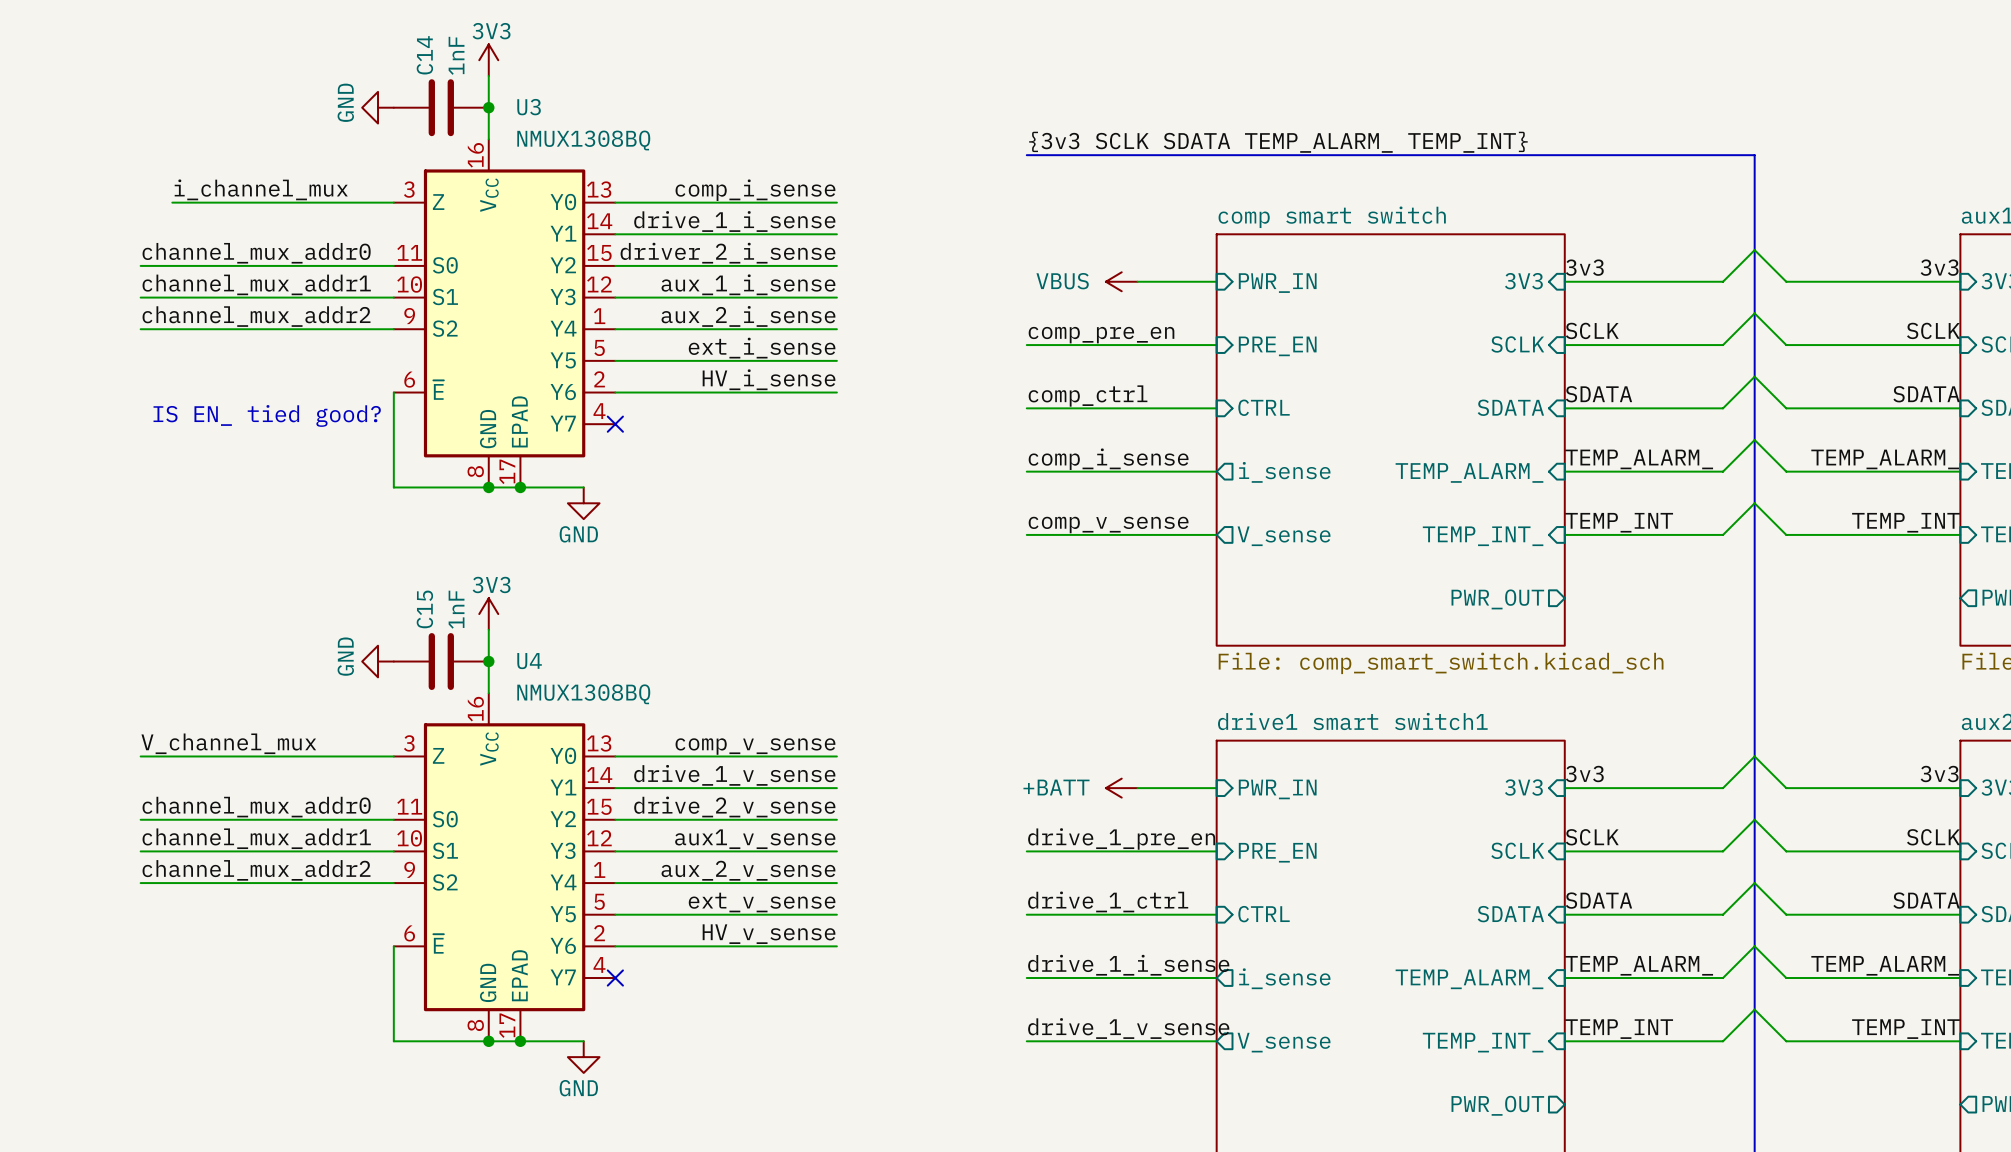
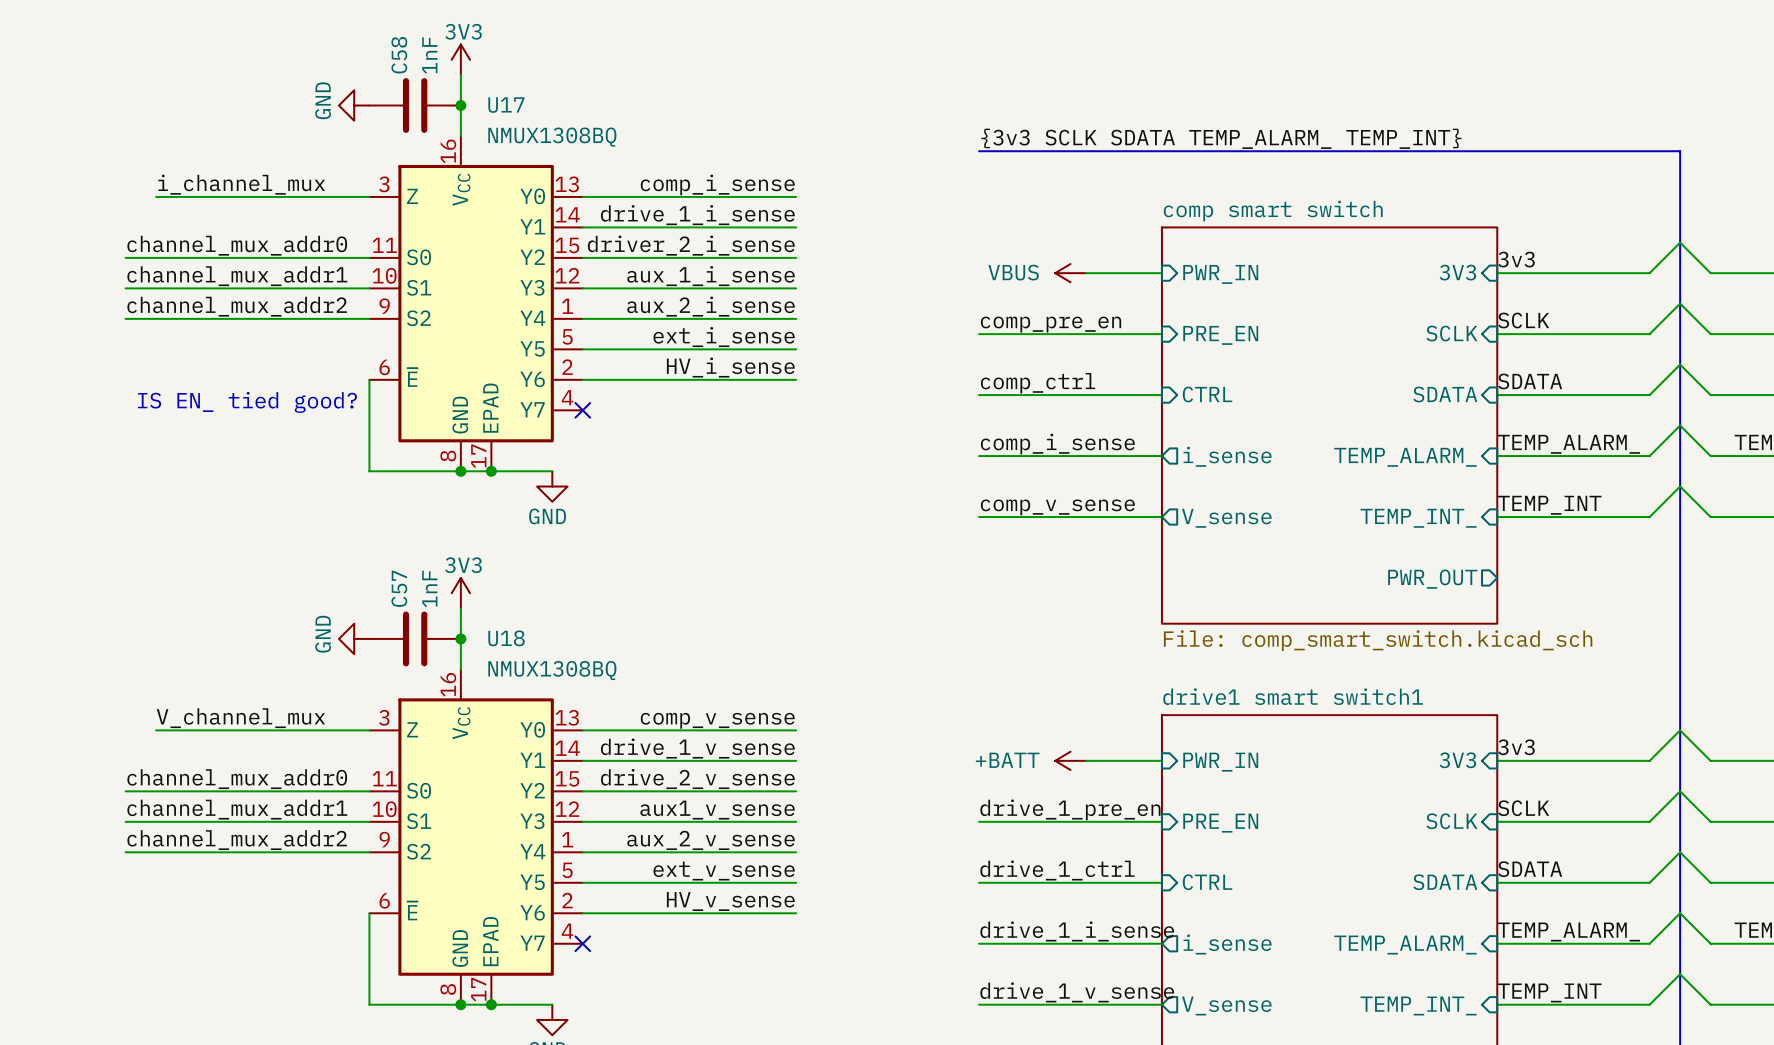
C14 name: C14 (424, 55) -> C58 (399, 55)
U3 name: U3 (529, 107) -> U17 (506, 105)
C15 name: C15 (424, 609) -> C57 (399, 588)
U4 name: U4 (529, 661) -> U18 (506, 638)
label position: V_channel_mux (228, 743) -> V_channel_mux (240, 718)
wire: (140, 756) (172, 756) -> none

